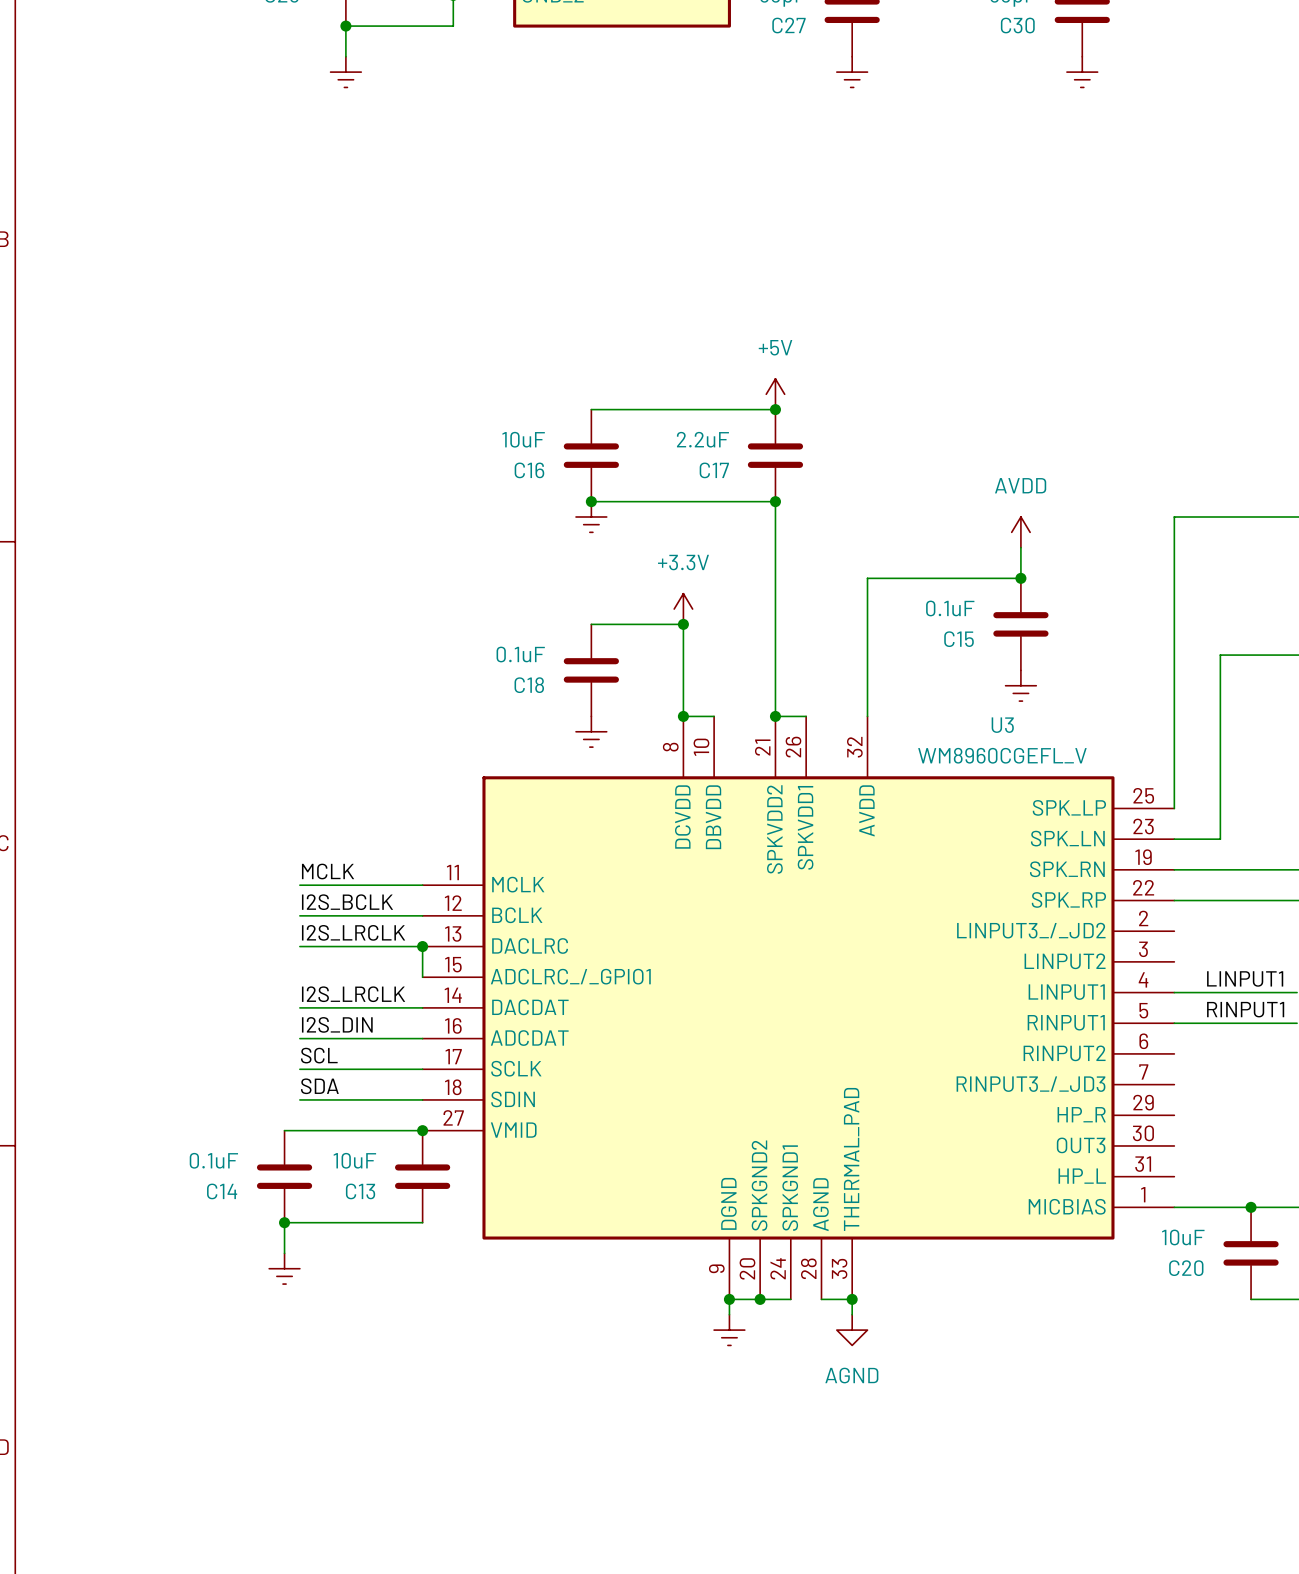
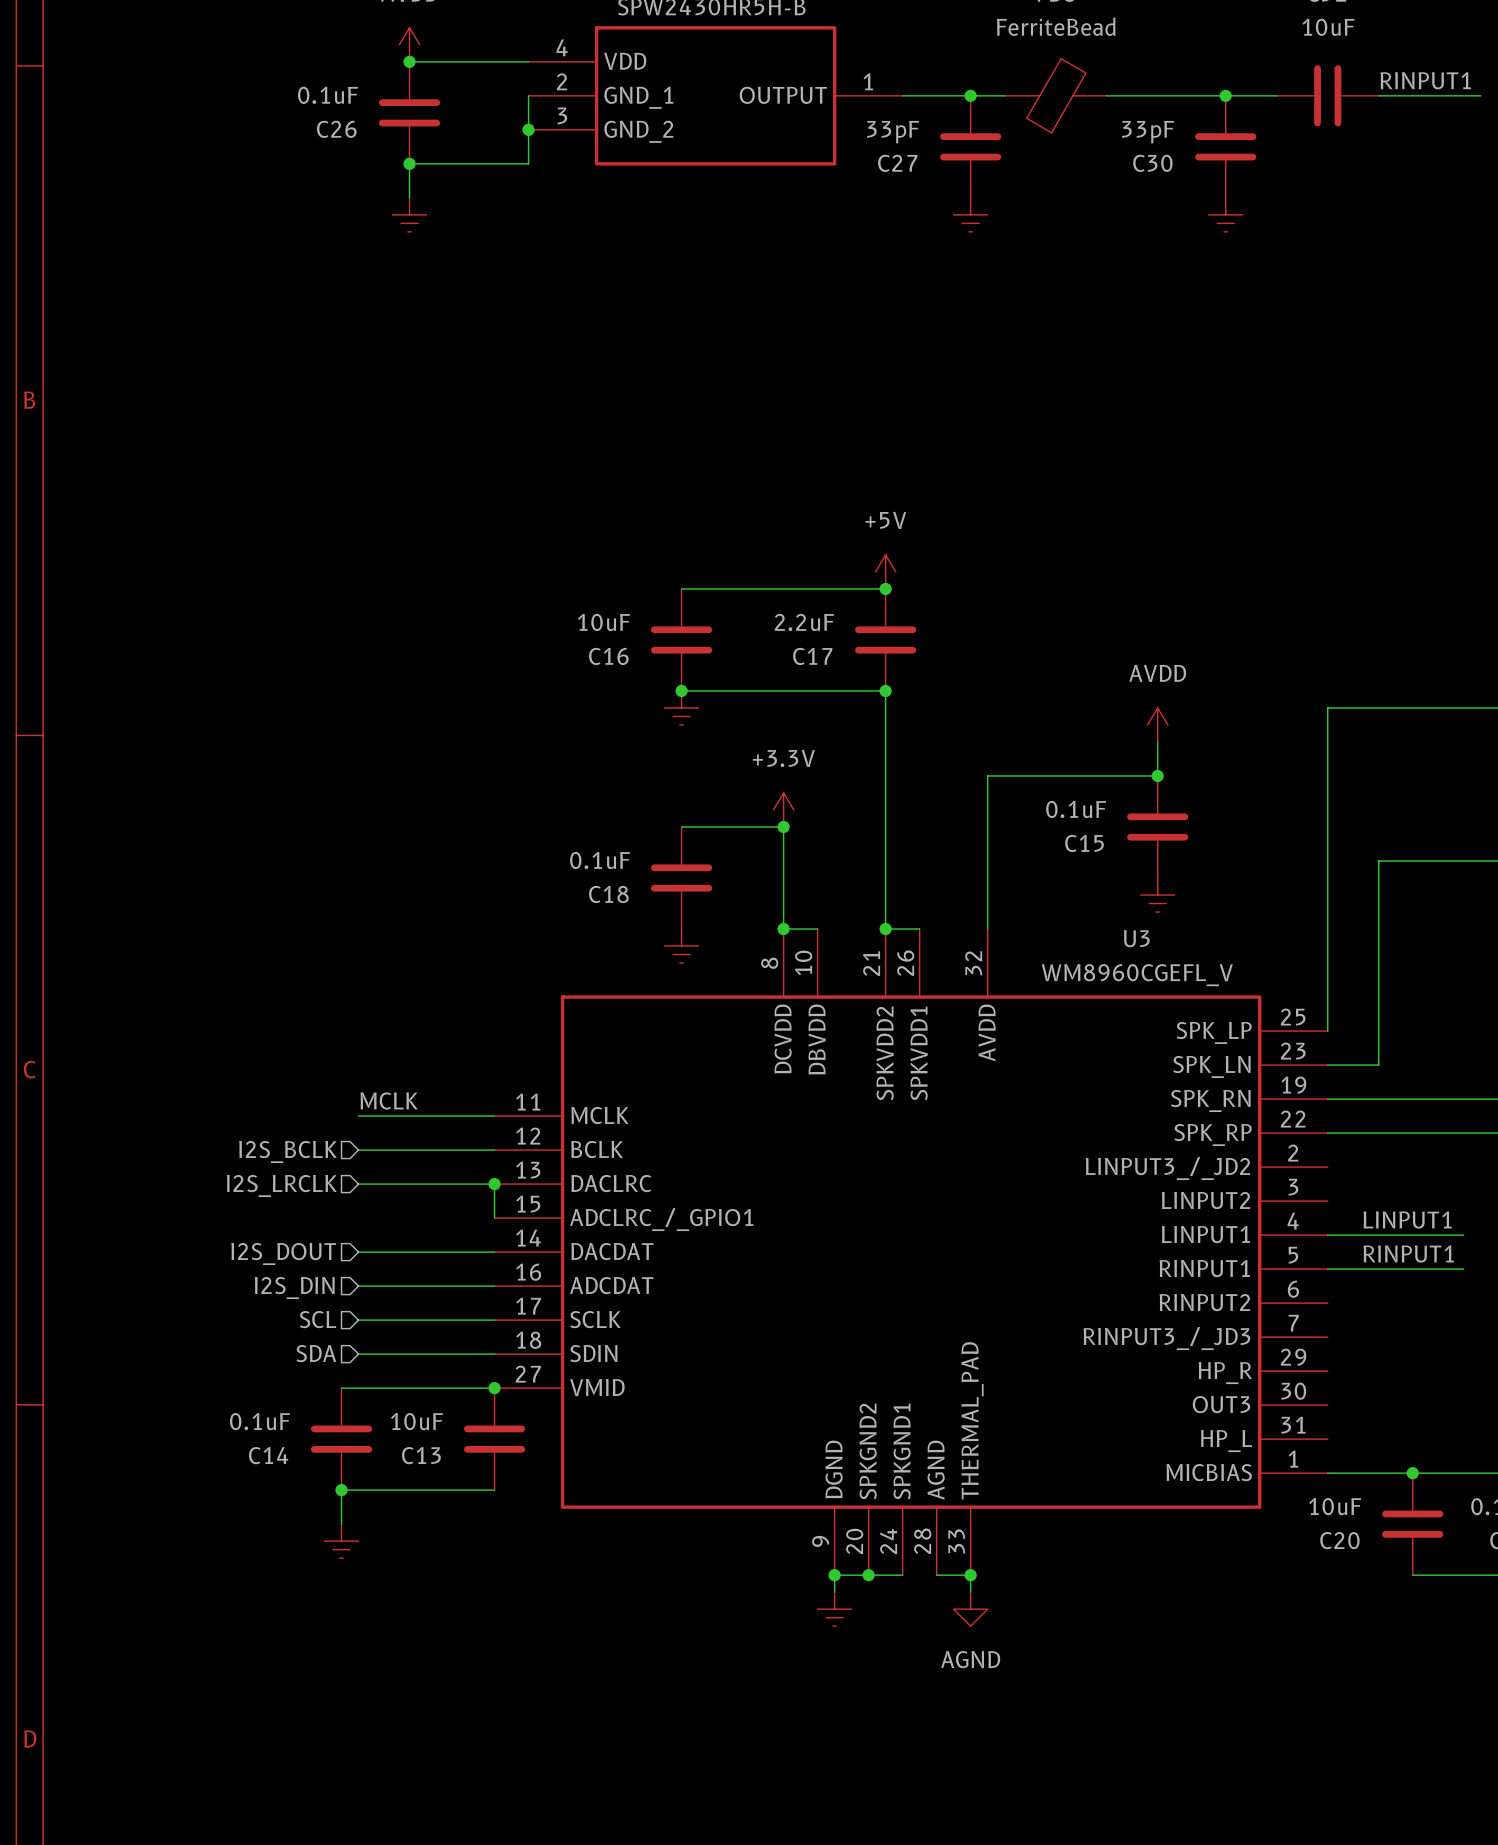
label: I2S_BCLK (347, 902) -> none
hierarchical label: none -> I2S_BCLK (287, 1151)
label: I2S_LRCLK (353, 932) -> none
hierarchical label: none -> I2S_LRCLK (281, 1185)
label: I2S_LRCLK (353, 994) -> none
hierarchical label: none -> I2S_DOUT (283, 1254)
label: I2S_DIN (337, 1024) -> none
hierarchical label: none -> I2S_DIN (294, 1288)
label: SCL (319, 1055) -> none
hierarchical label: none -> SCL (318, 1319)
label: SDA (319, 1086) -> none
hierarchical label: none -> SDA (316, 1353)

